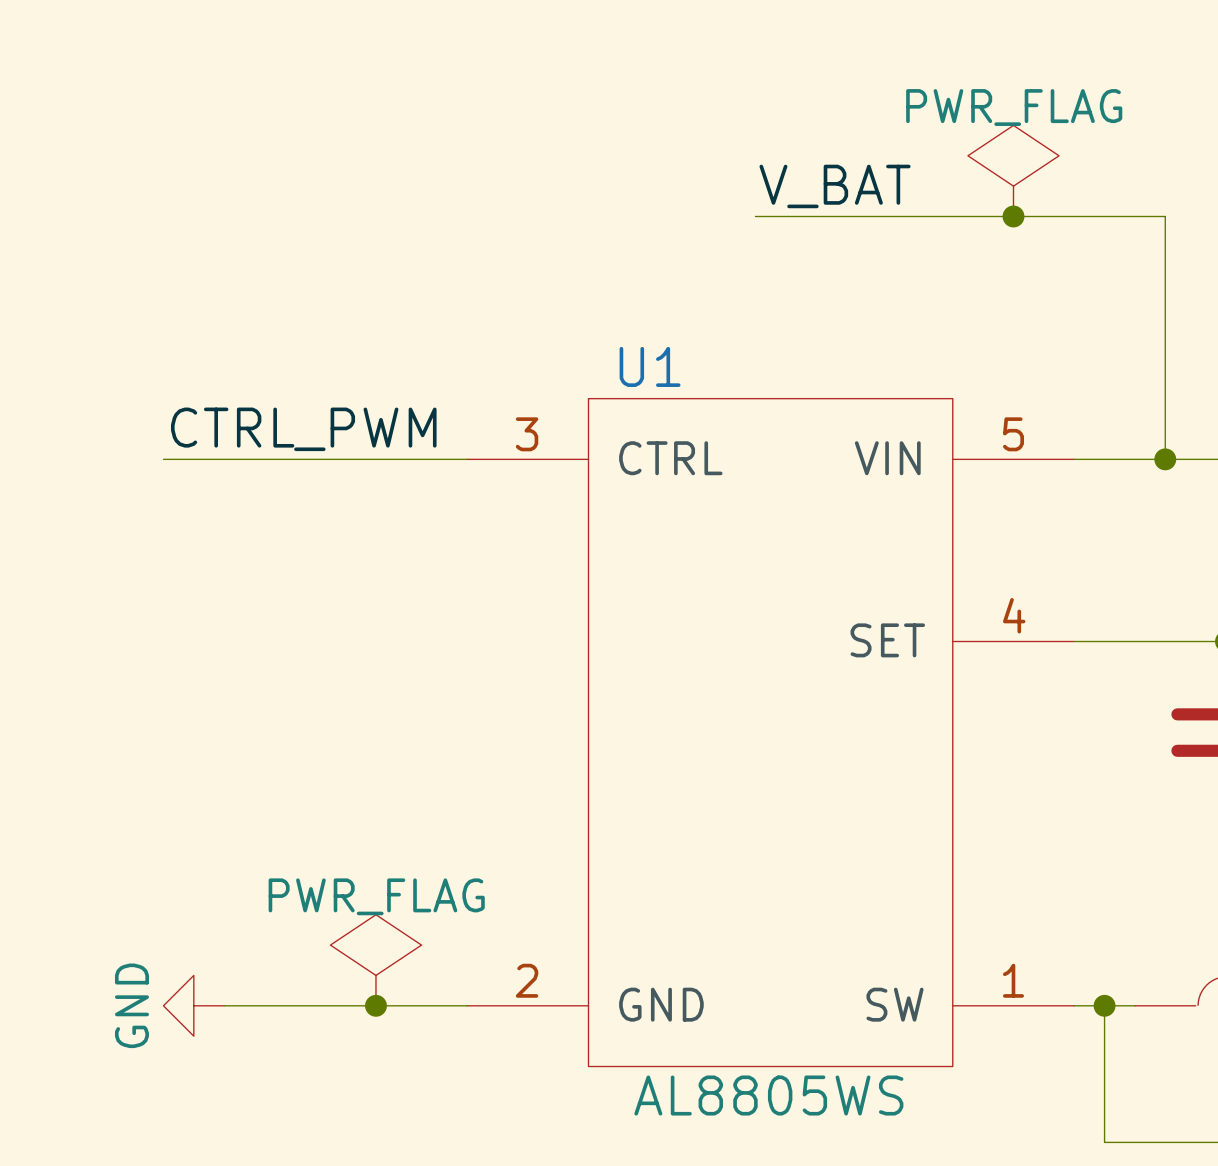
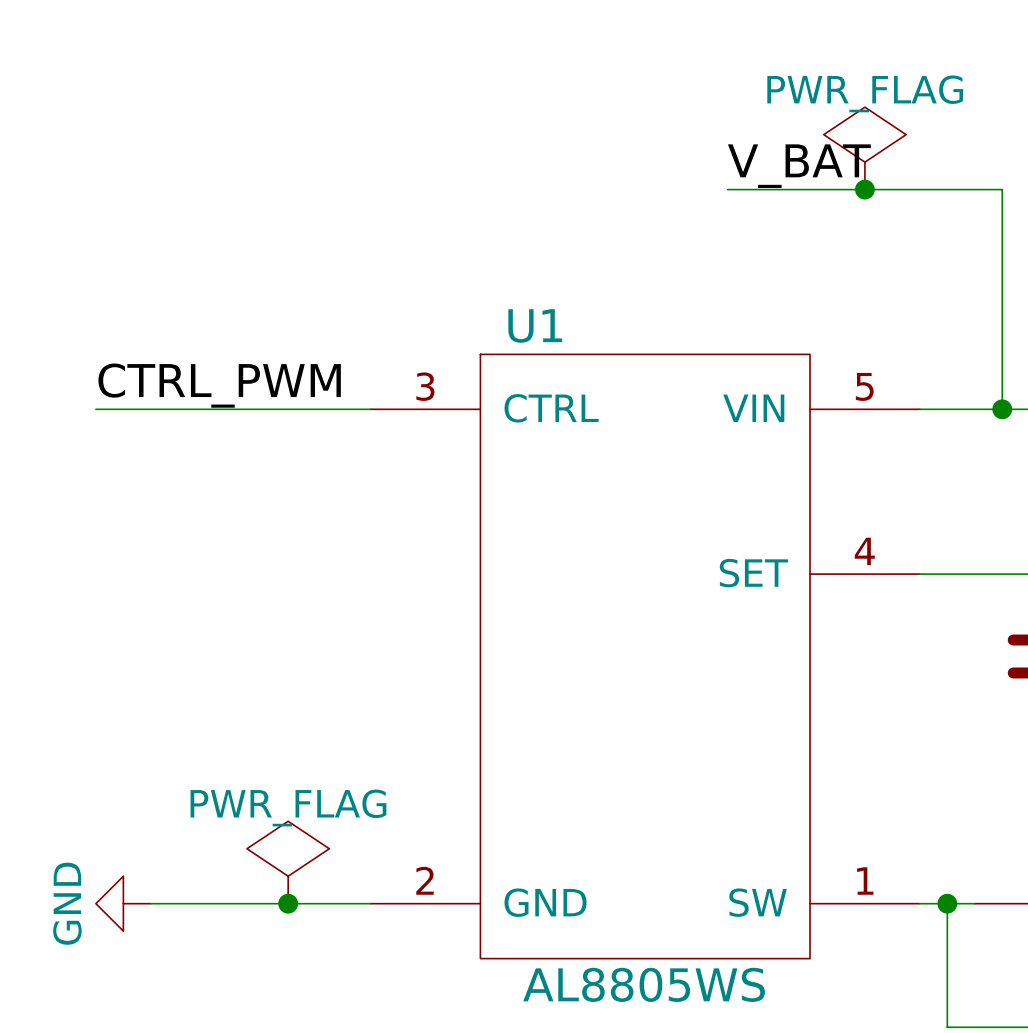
label position: V_BAT (835, 186) -> V_BAT (799, 166)
wire: (755, 216) (861, 216) -> none

